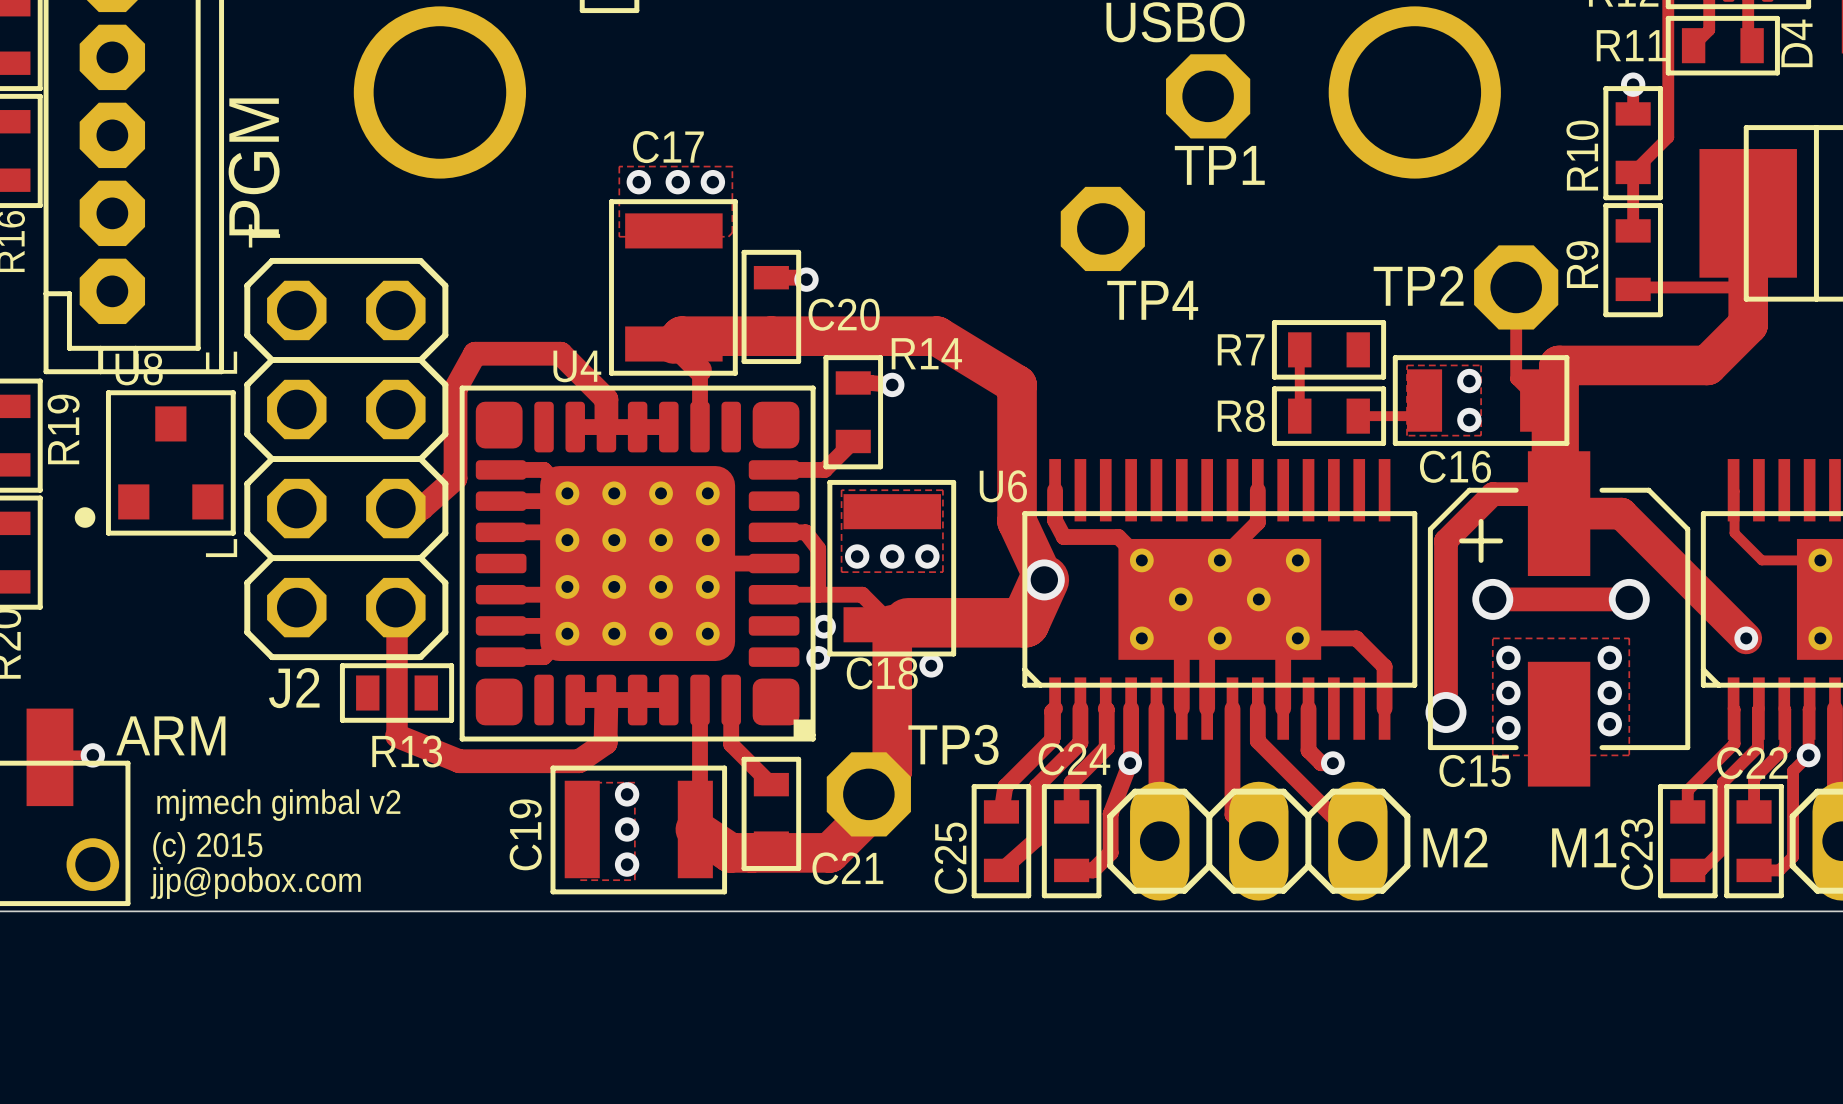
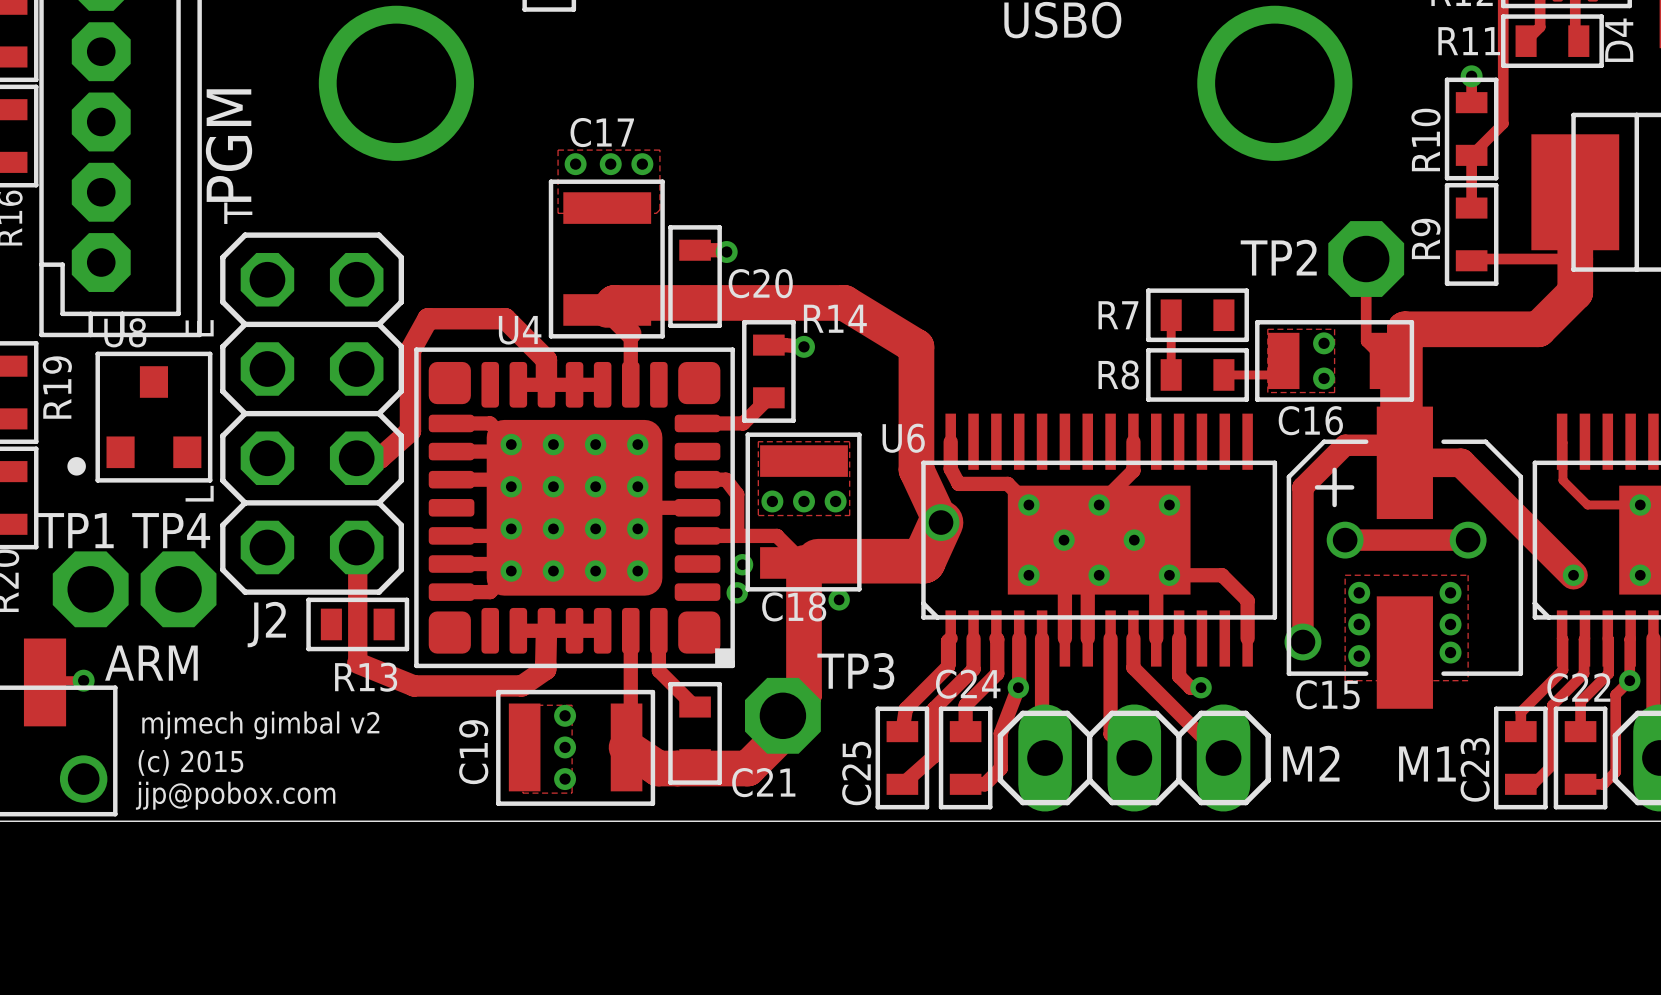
TP1 position: (1208, 96) -> (90, 589)
TP1 name position: TP1 (1219, 165) -> TP1 (75, 530)
TP4 position: (1102, 228) -> (178, 589)
TP4 name position: TP4 (1152, 300) -> TP4 (171, 530)

